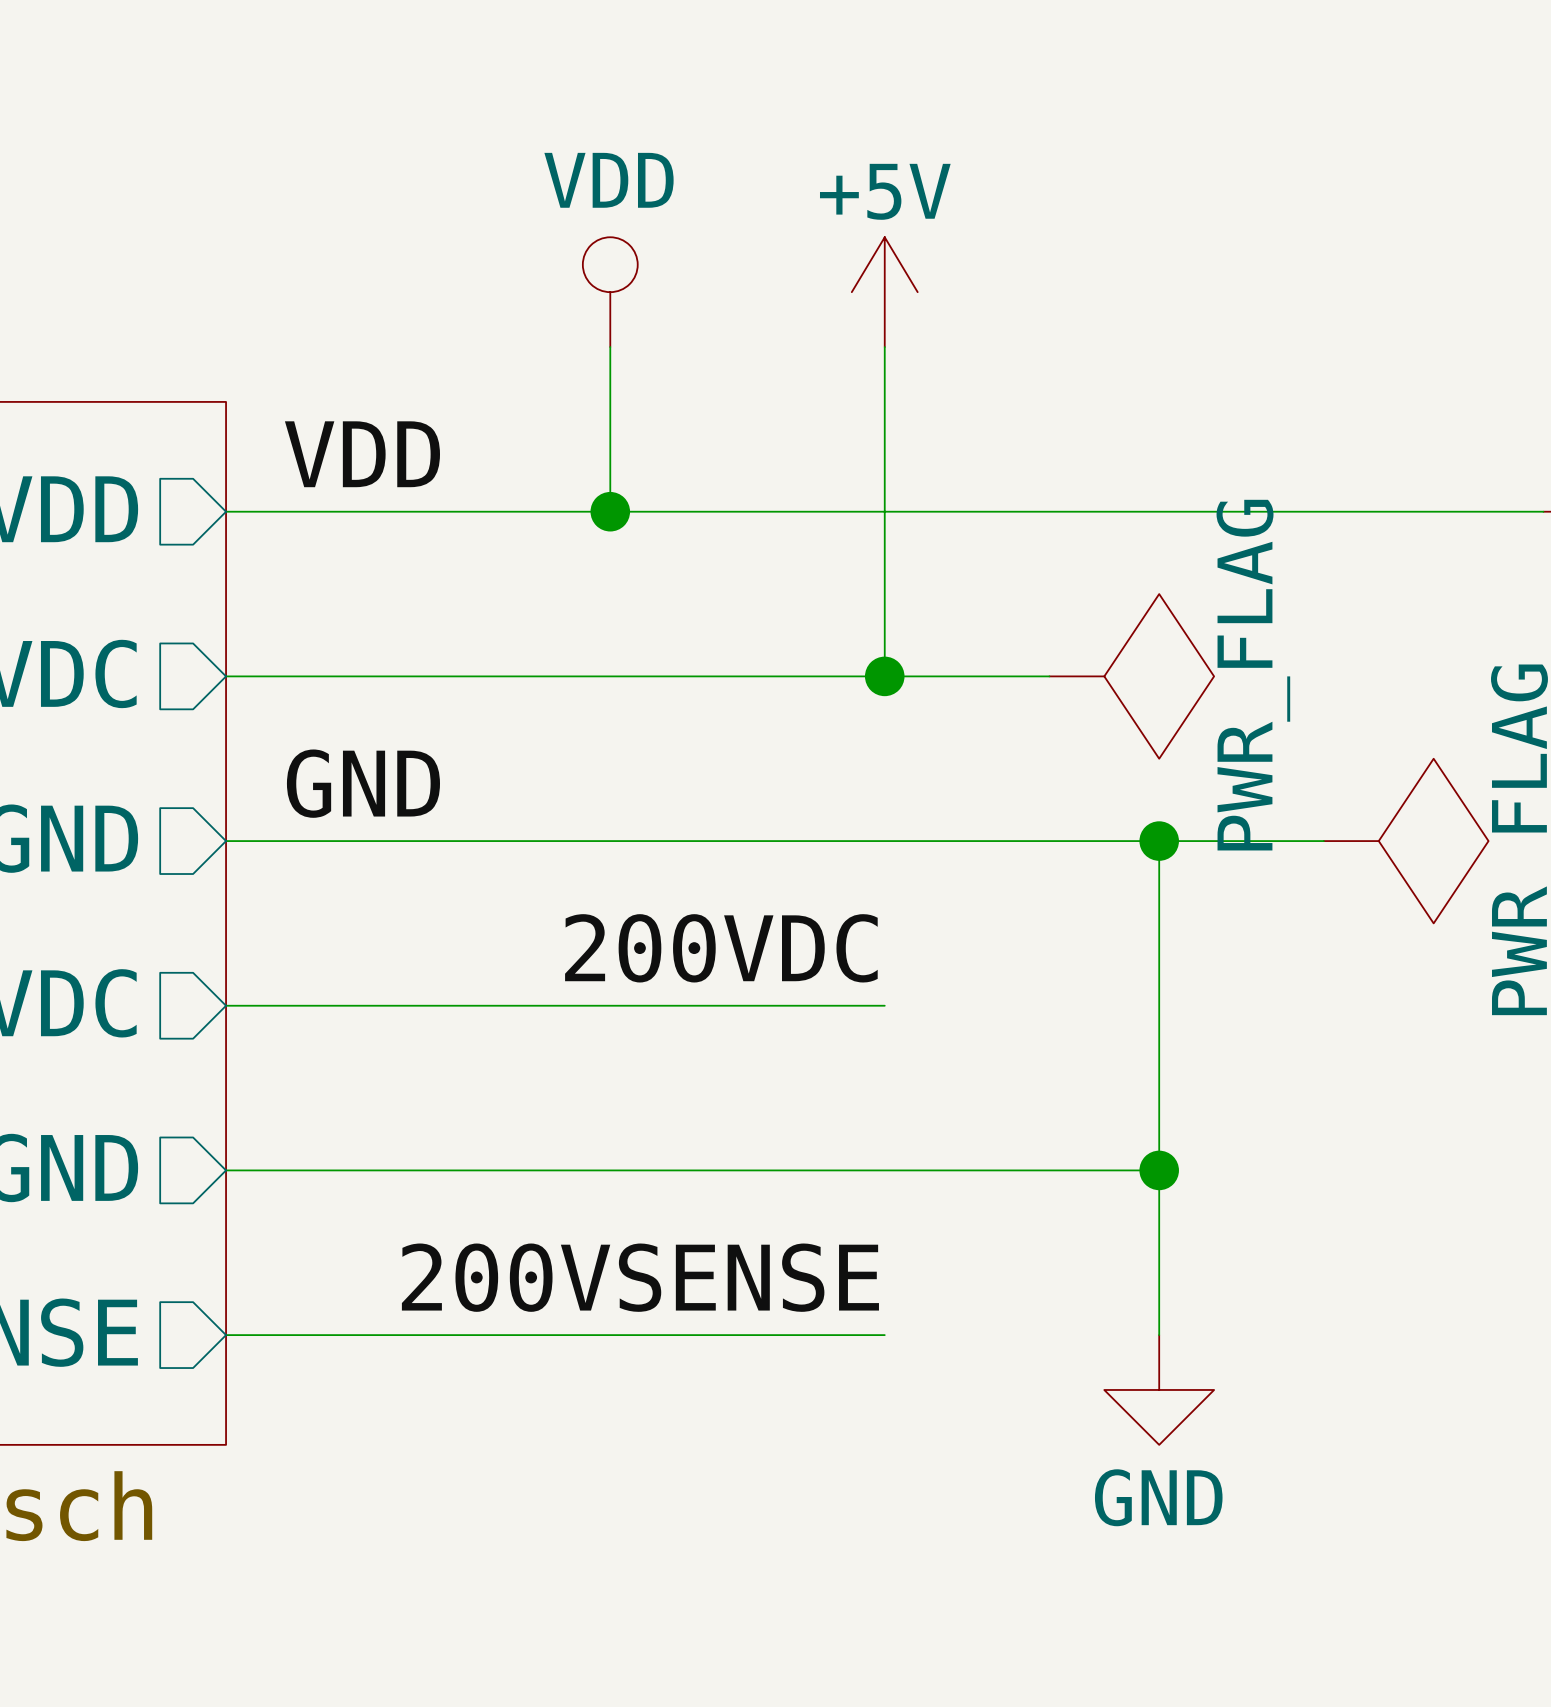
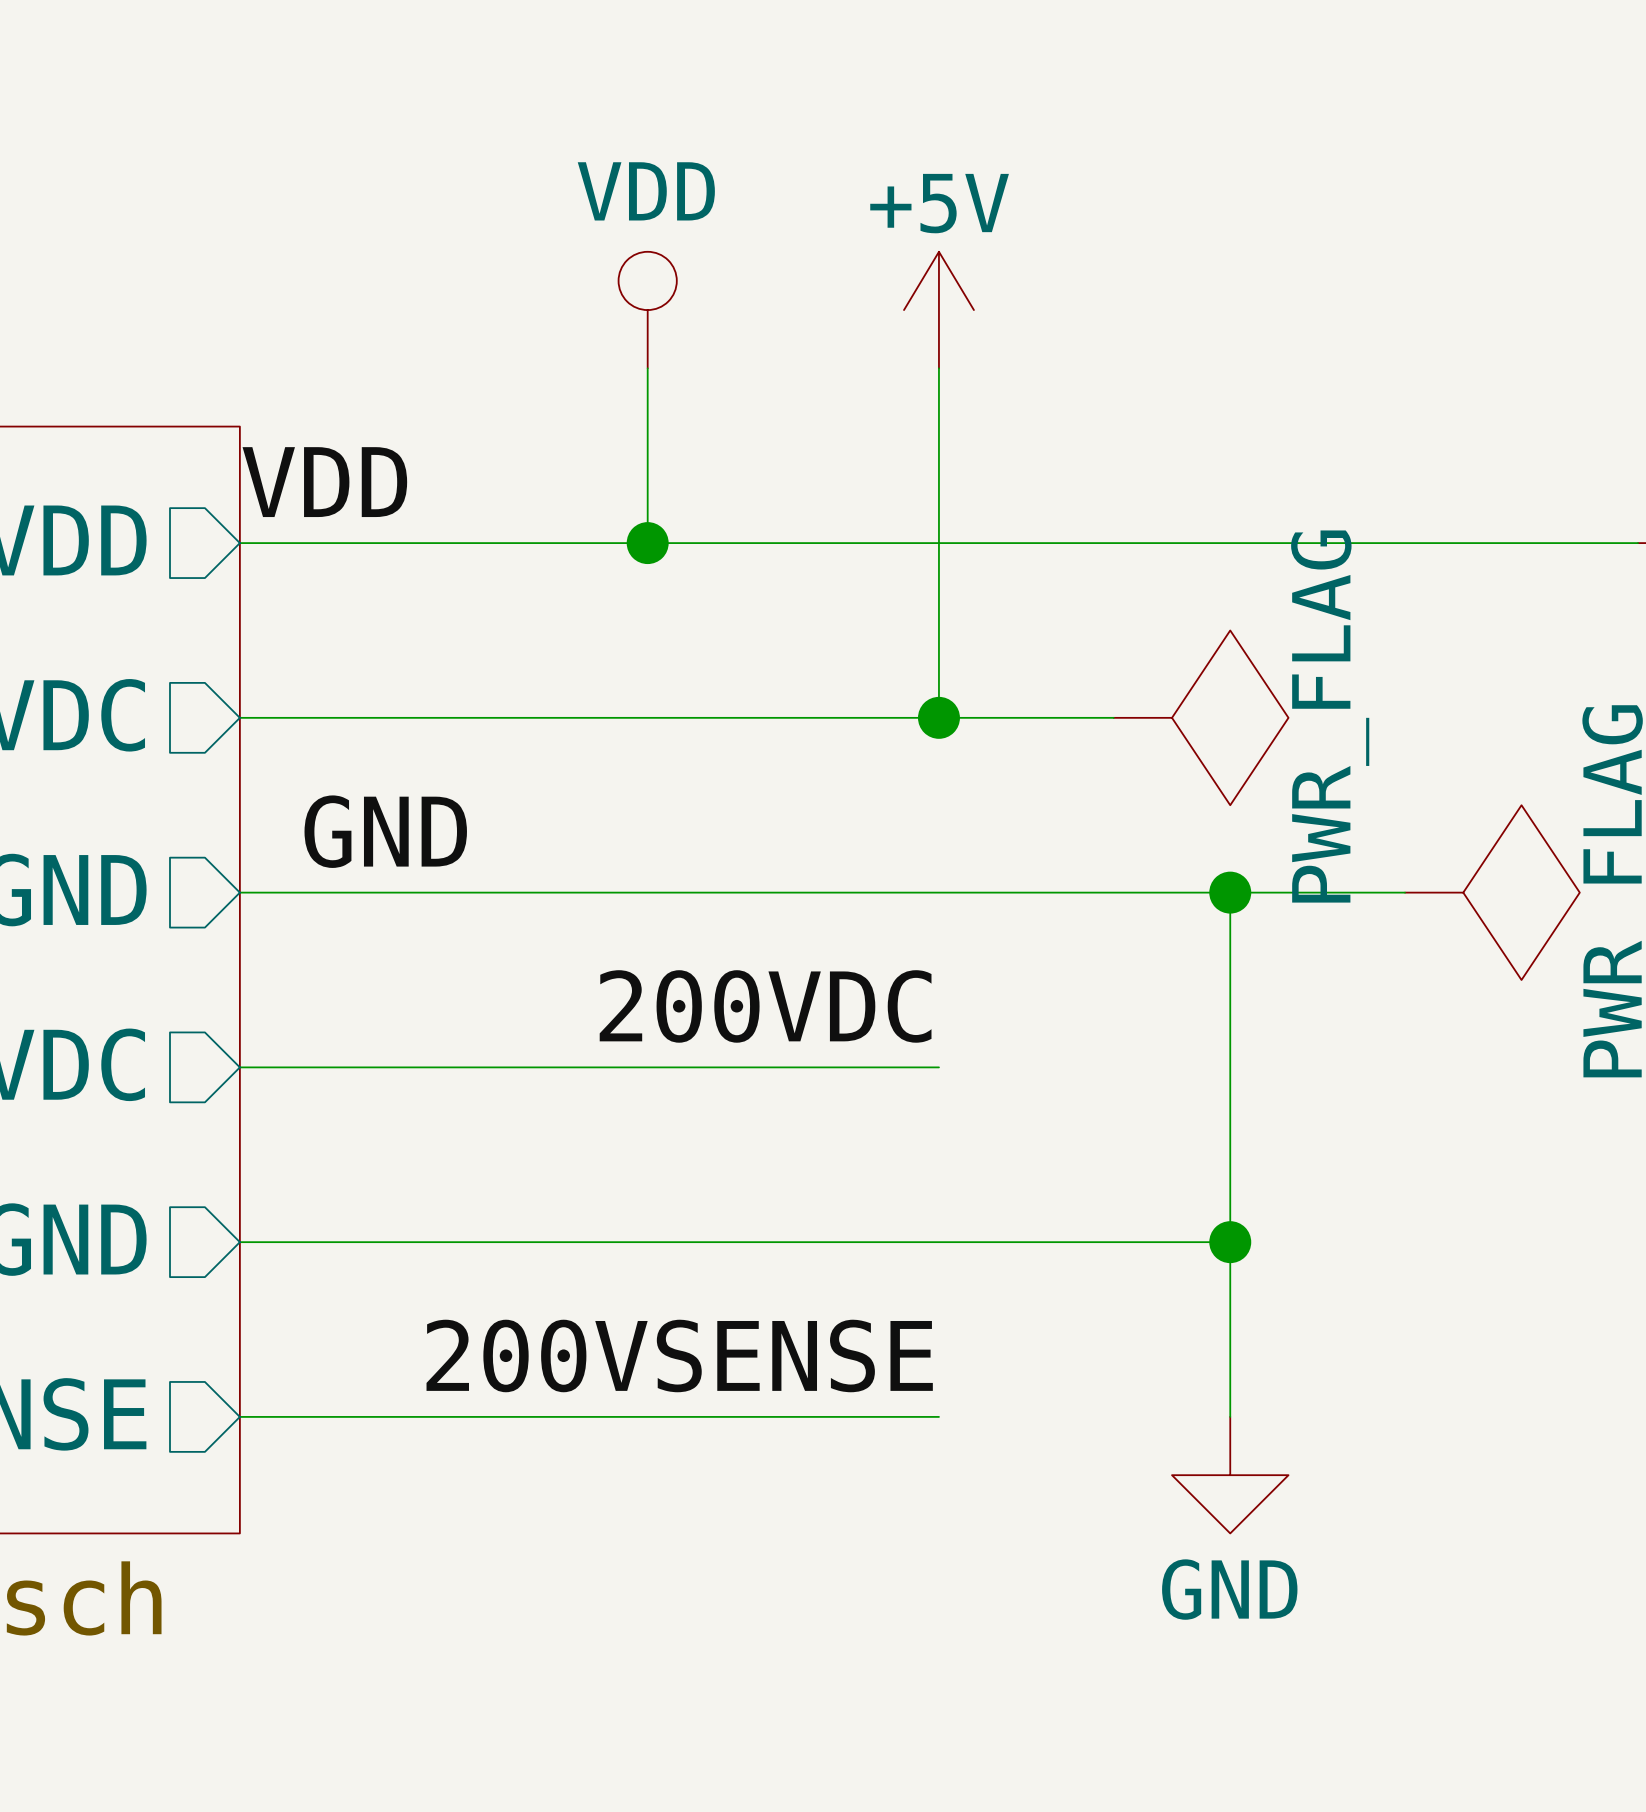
label position: VDD (362, 454) -> VDD (324, 482)

